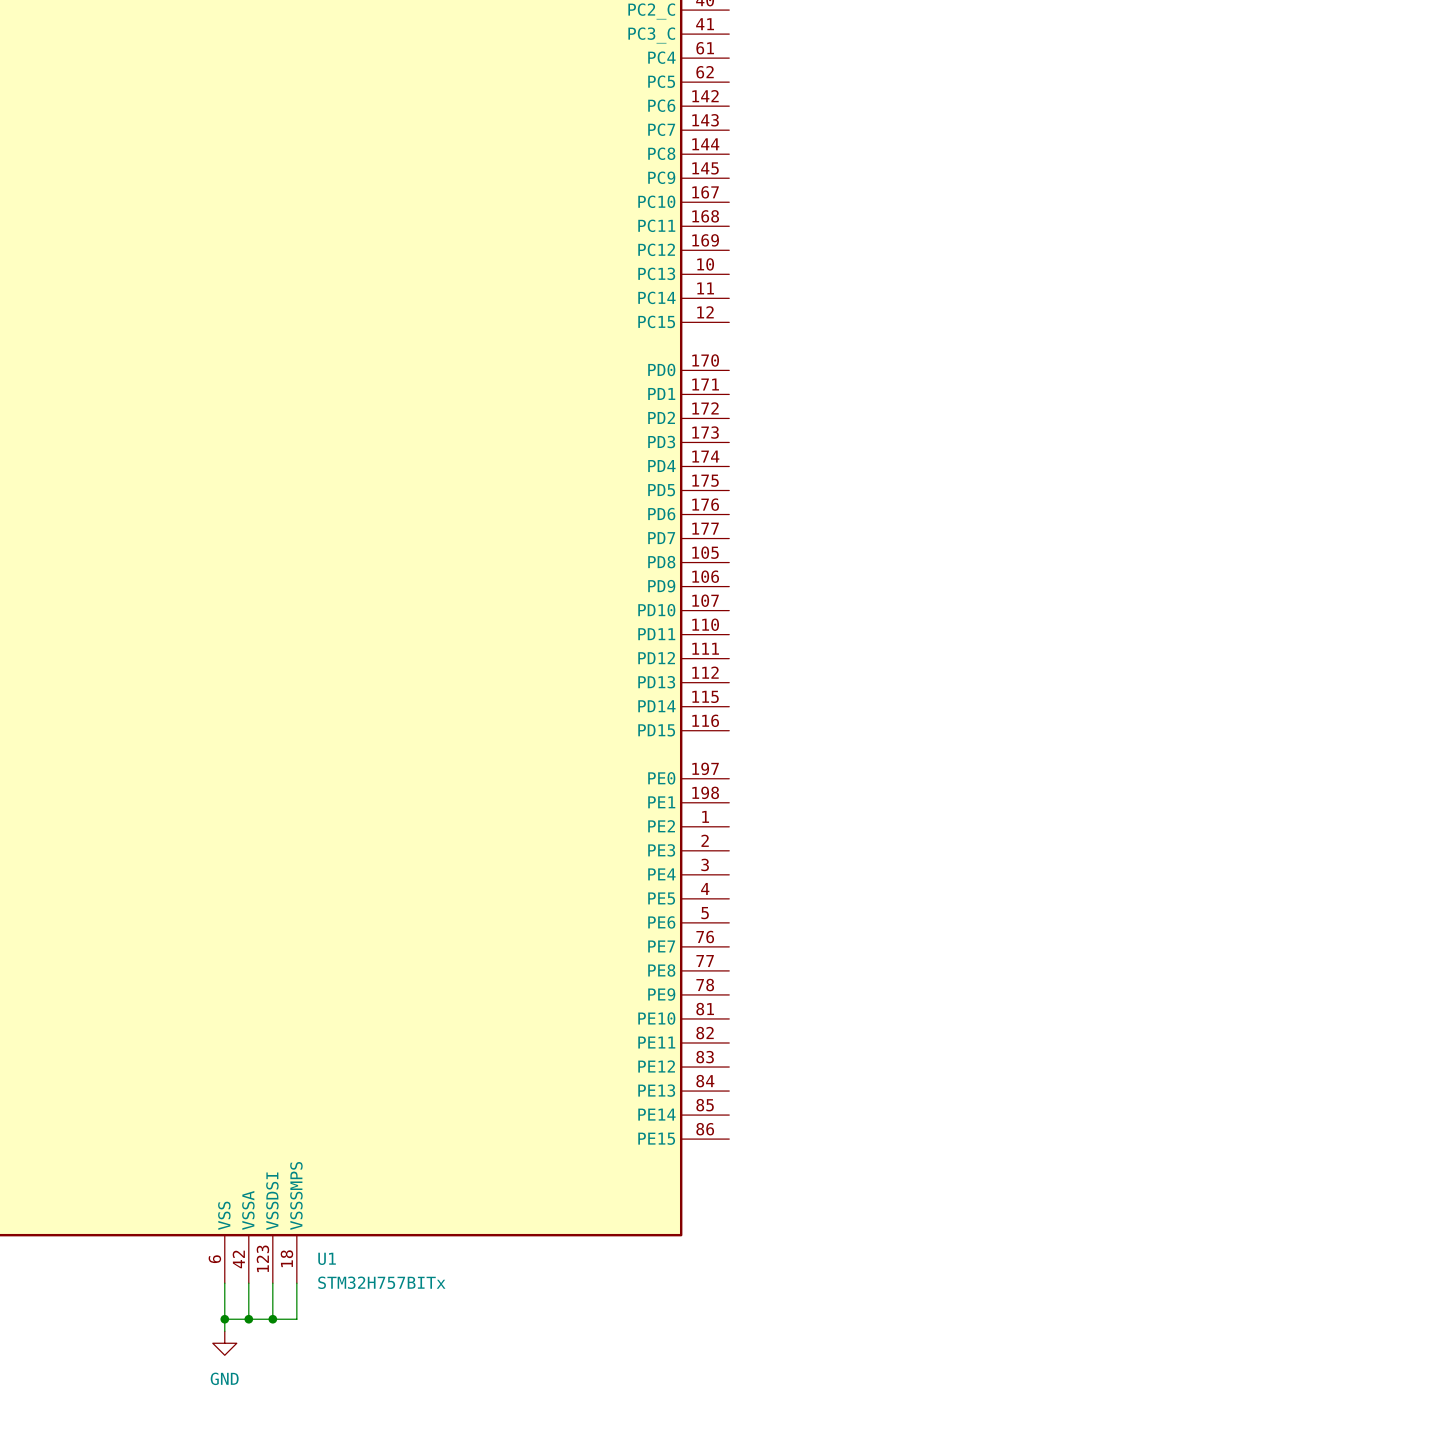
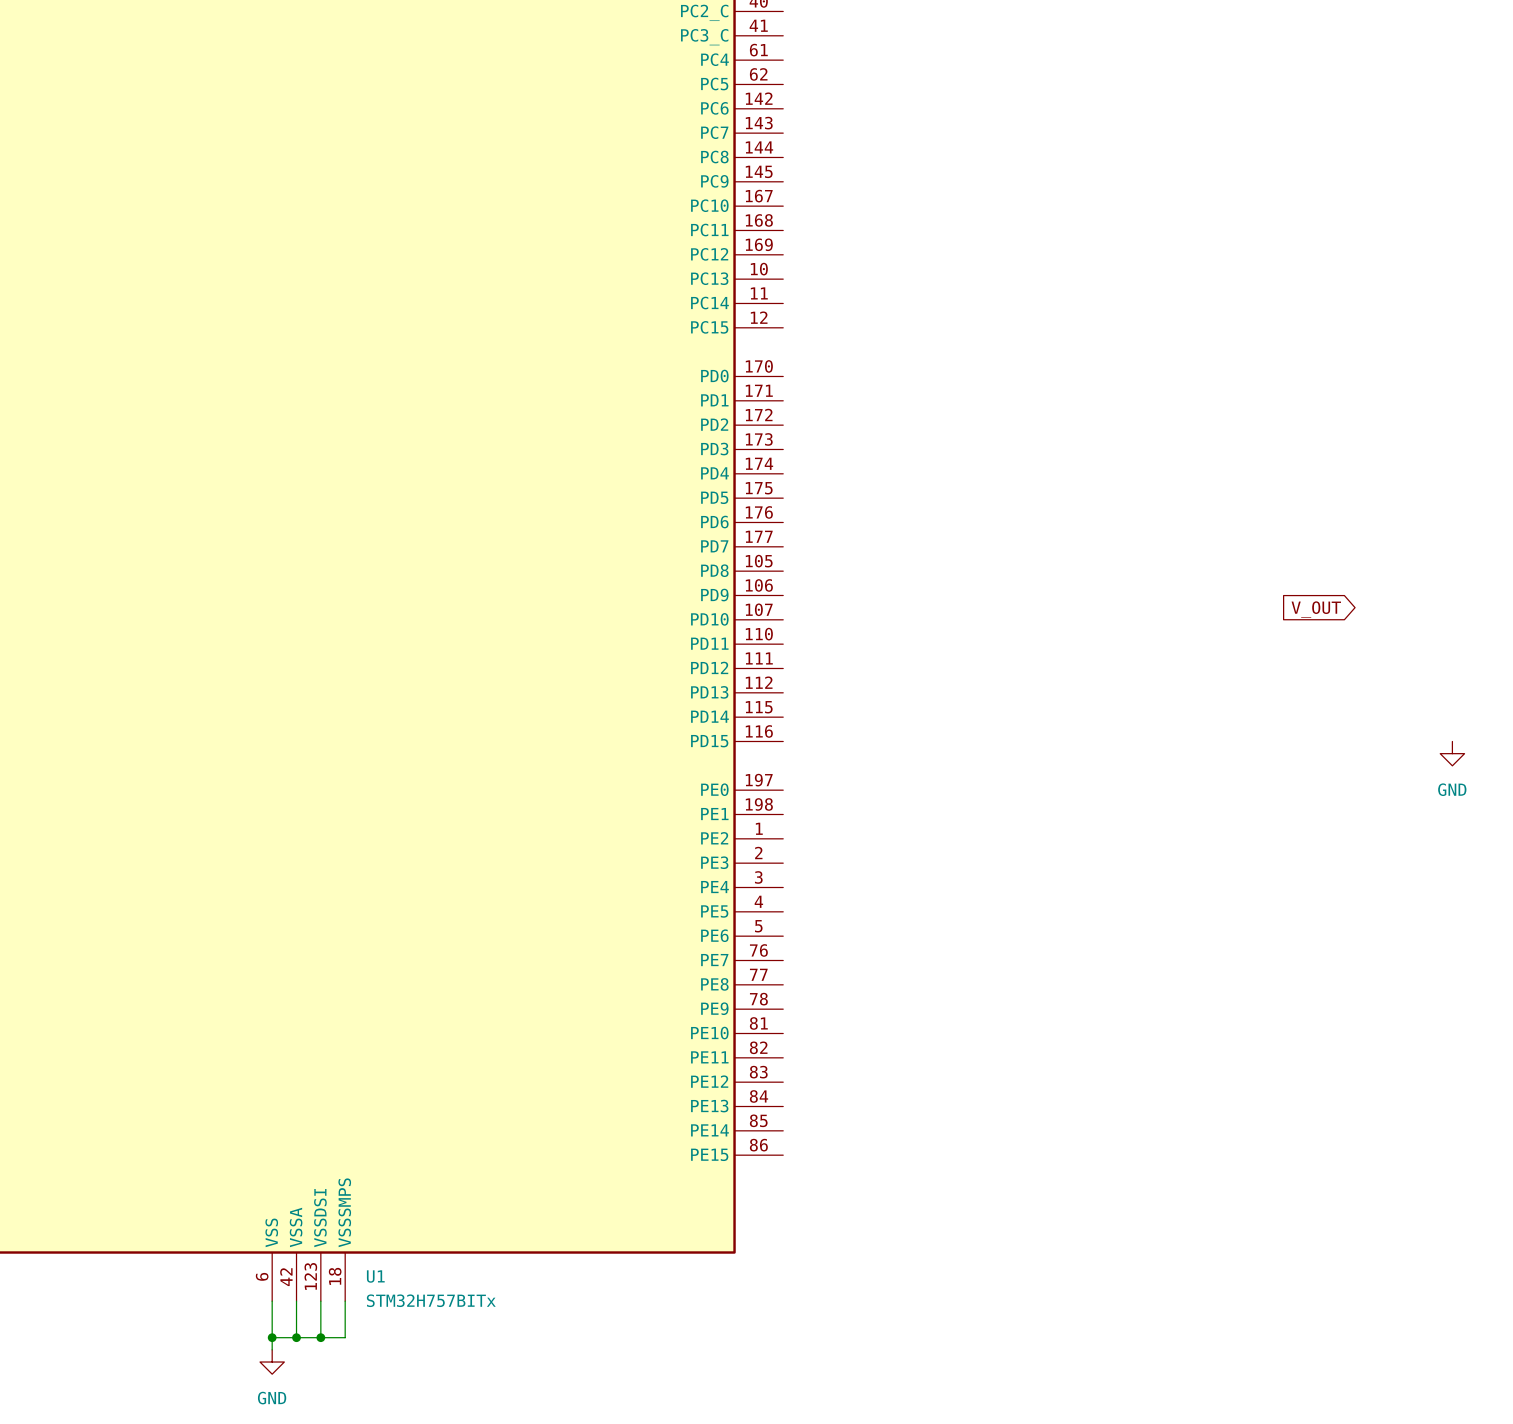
global label: none -> V_OUT (1316, 609)
power symbol: none -> GND (1452, 753)

